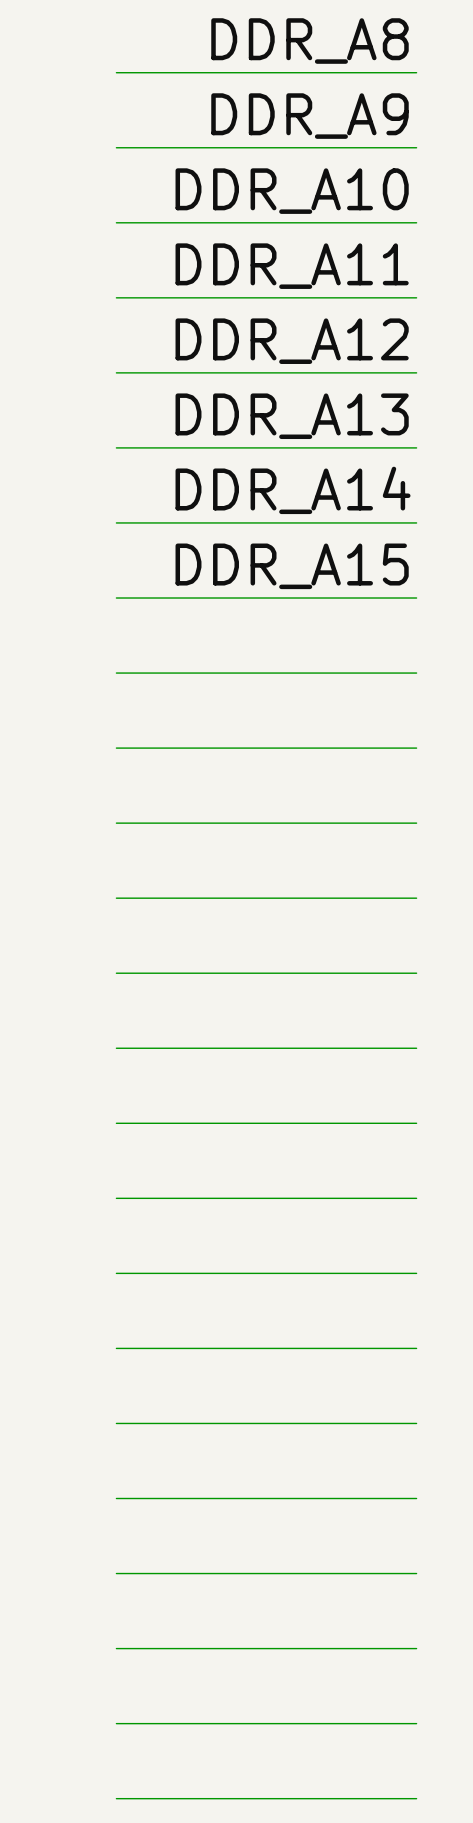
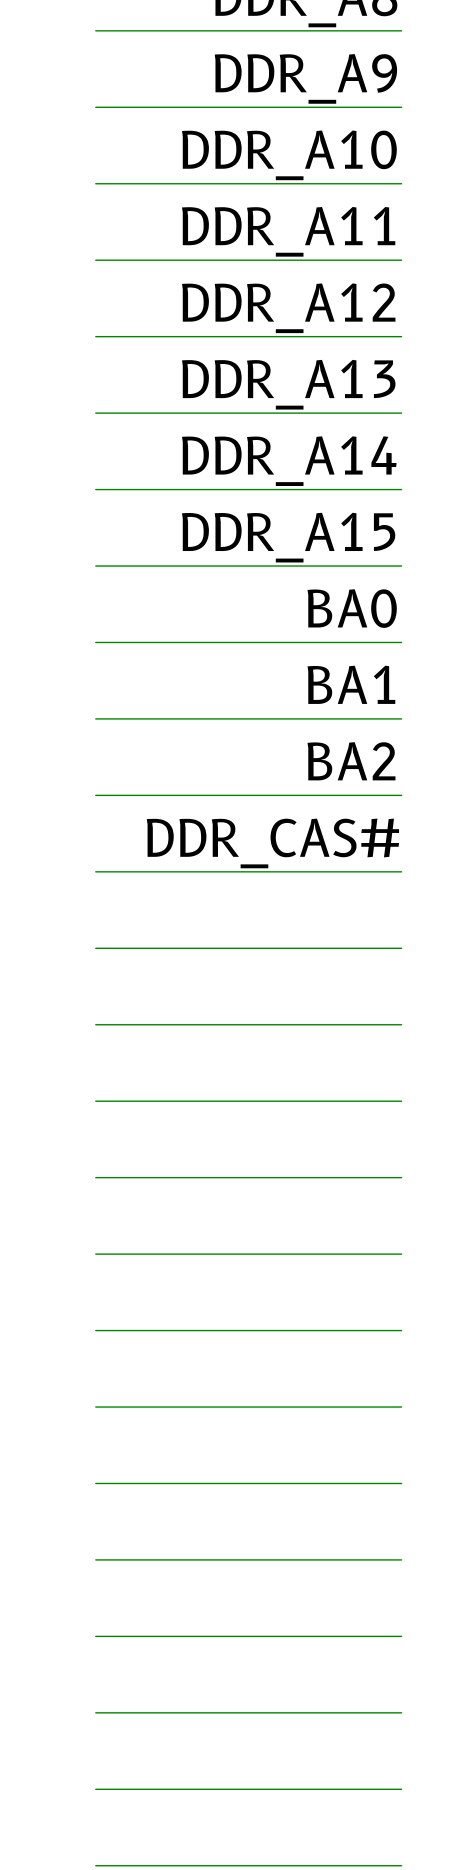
label: none -> BA0 (352, 608)
label: none -> BA1 (351, 684)
label: none -> BA2 (351, 761)
label: none -> DDR_CAS# (272, 843)

